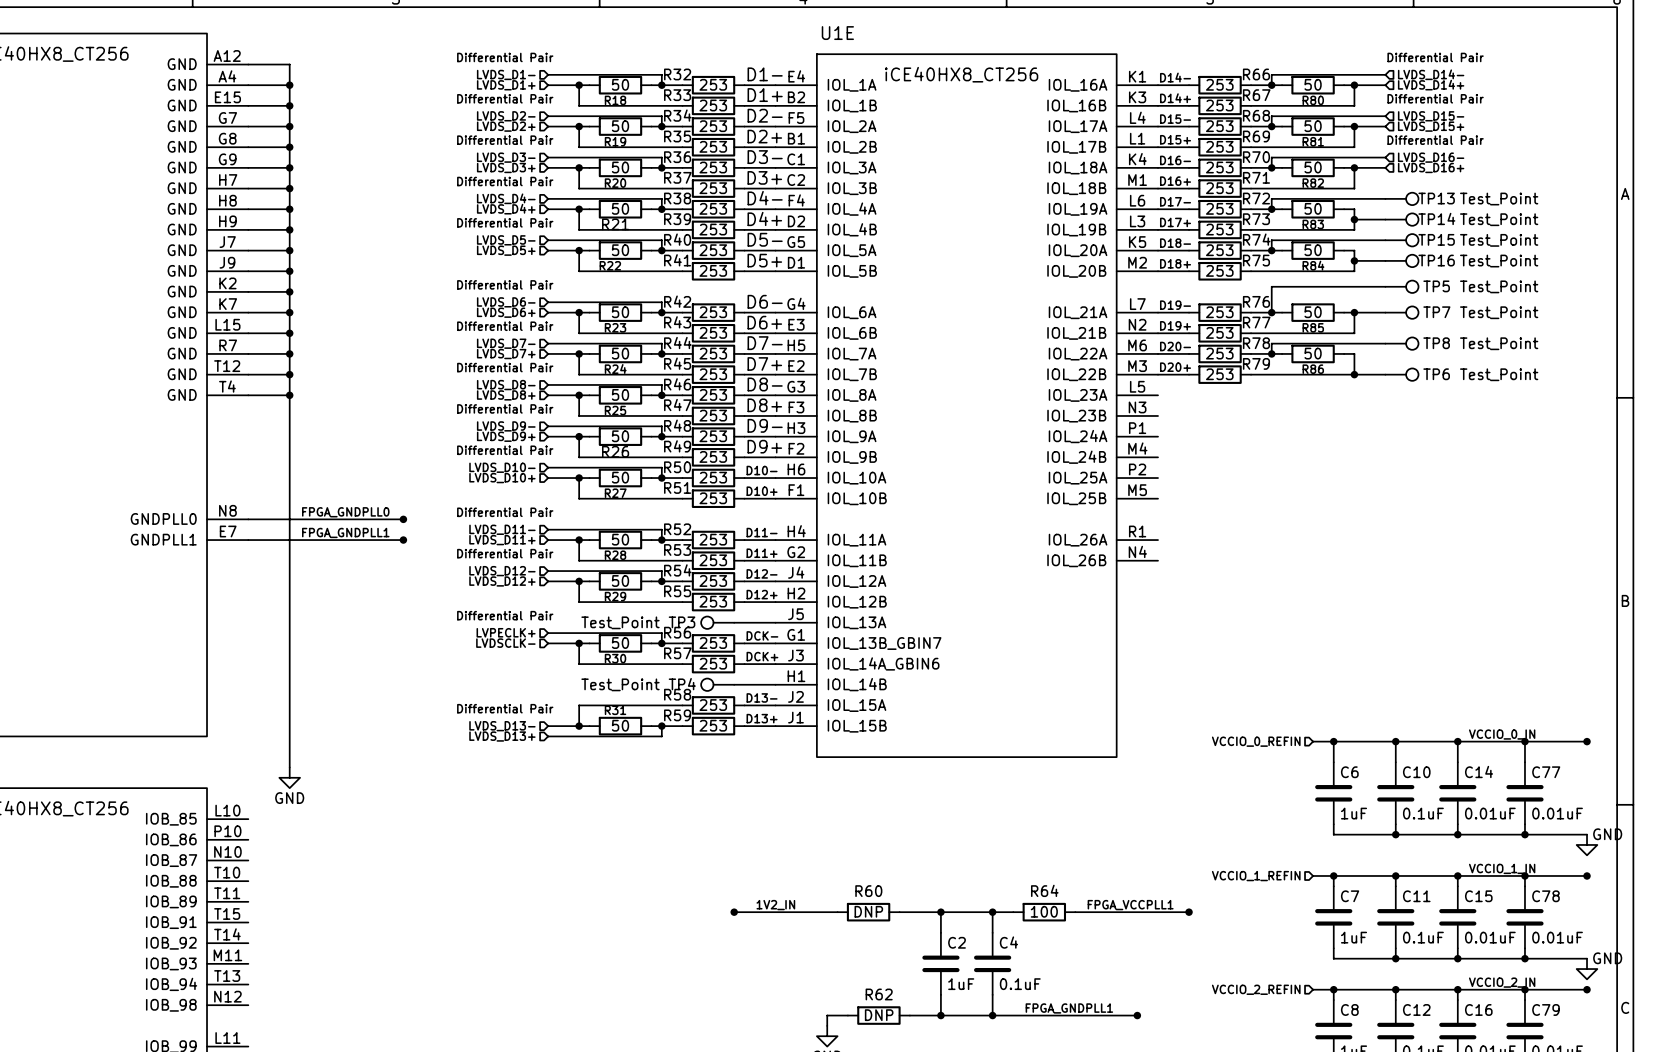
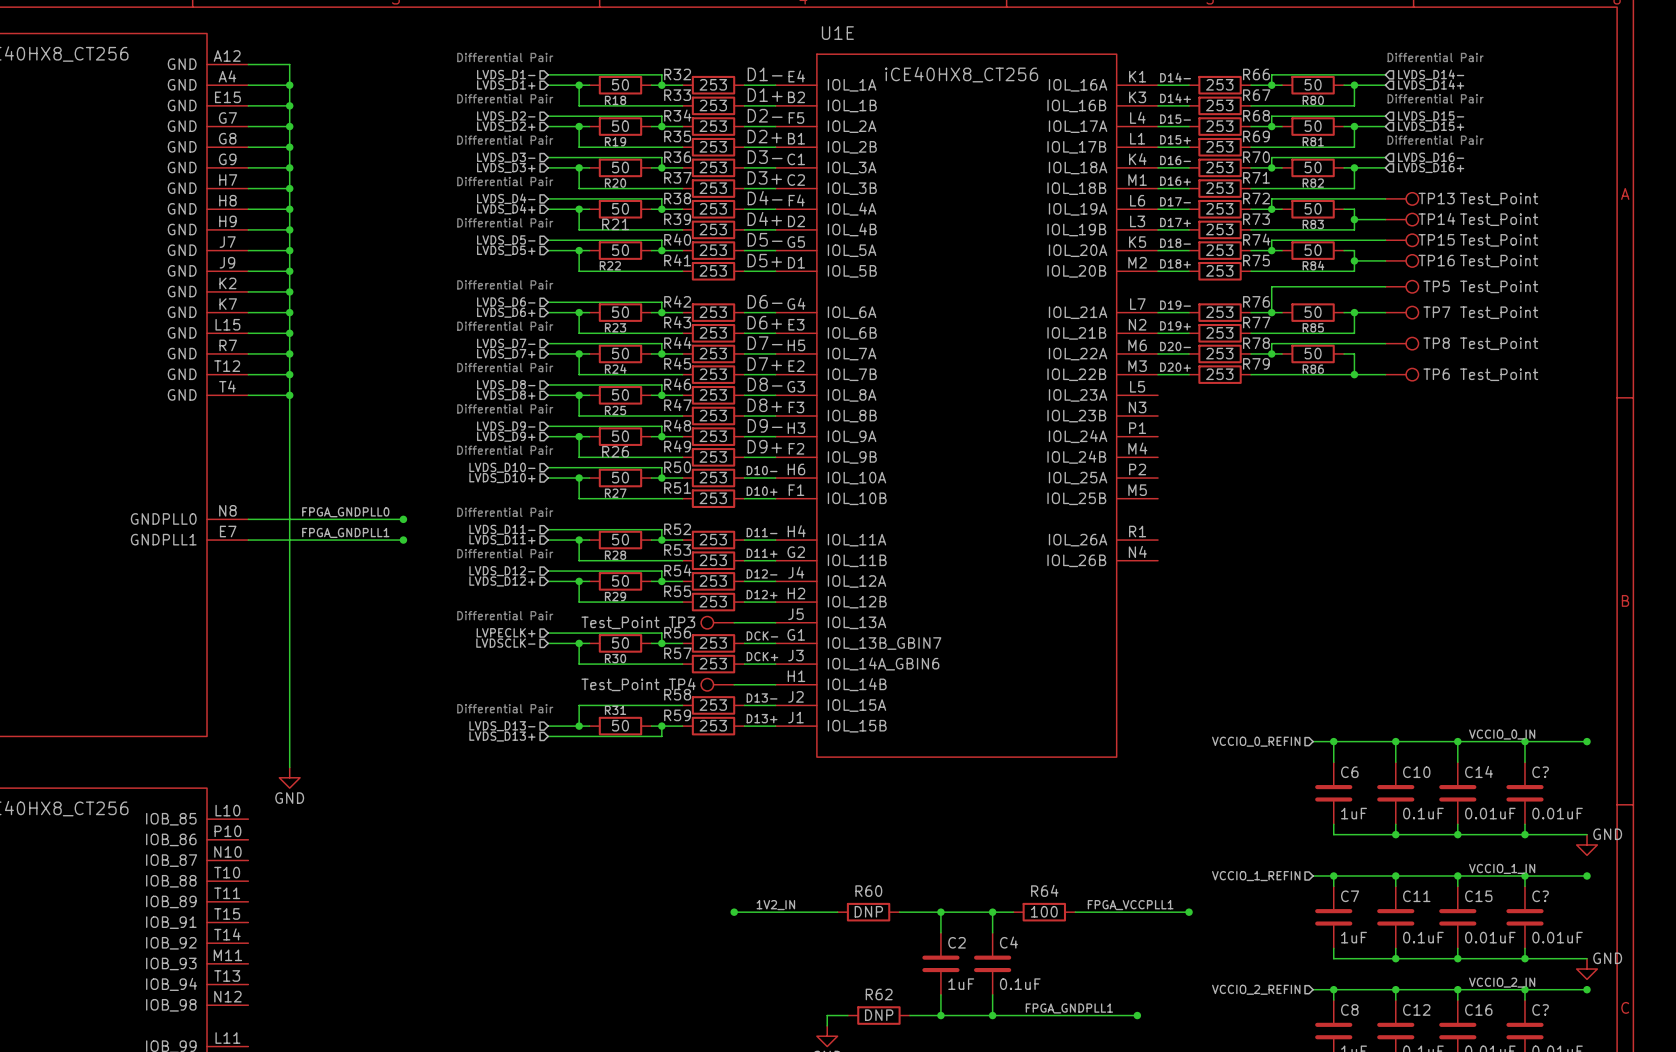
C77 name: C77 (1546, 772) -> C? (1540, 772)
C78 name: C78 (1545, 896) -> C? (1540, 896)
C79 name: C79 (1545, 1009) -> C? (1540, 1009)

